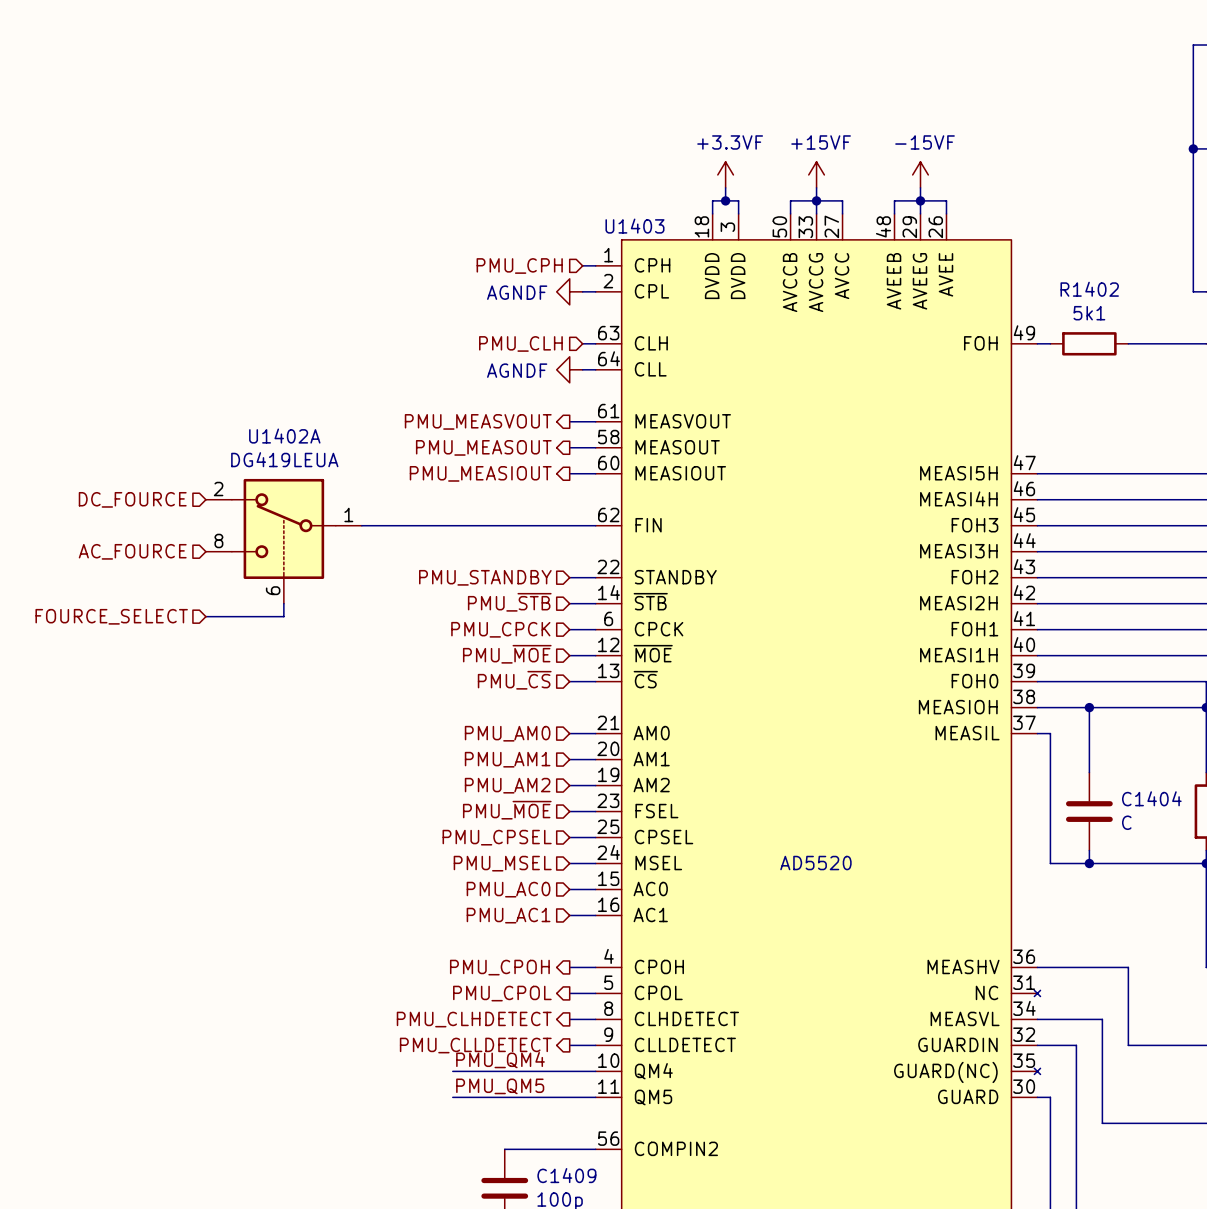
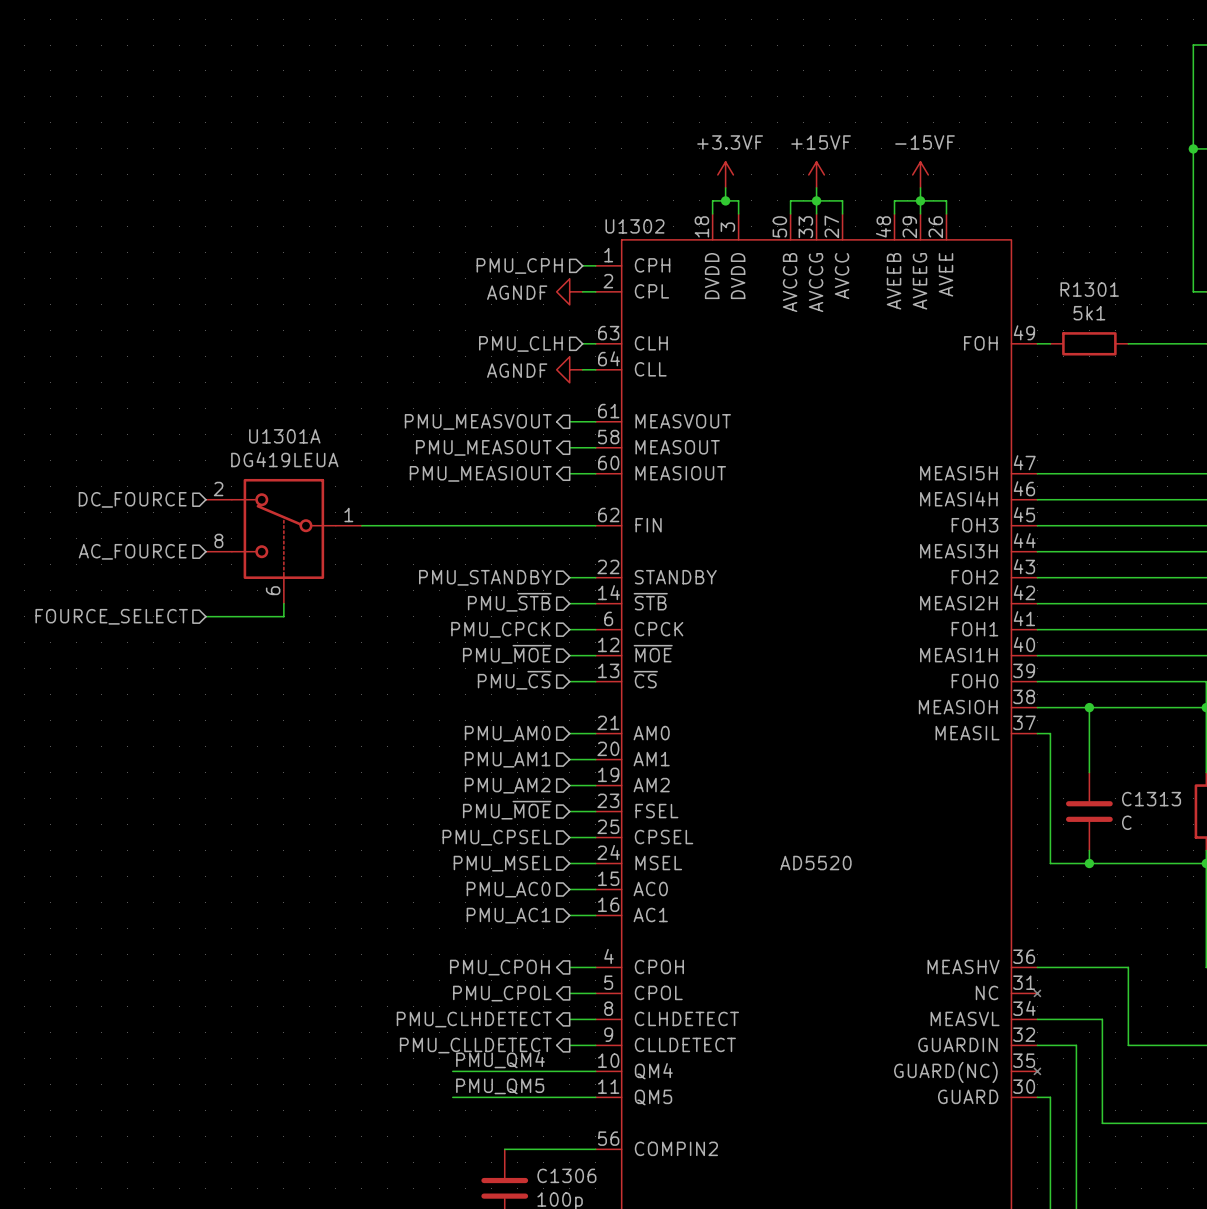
U1403 name: U1403 (634, 226) -> U1302 (634, 226)
R1402 name: R1402 (1089, 289) -> R1301 (1089, 289)
U1402A name: U1402A (284, 436) -> U1301A (284, 436)
C1404 name: C1404 (1151, 798) -> C1313 (1151, 799)
C1409 name: C1409 (566, 1175) -> C1306 (566, 1175)

